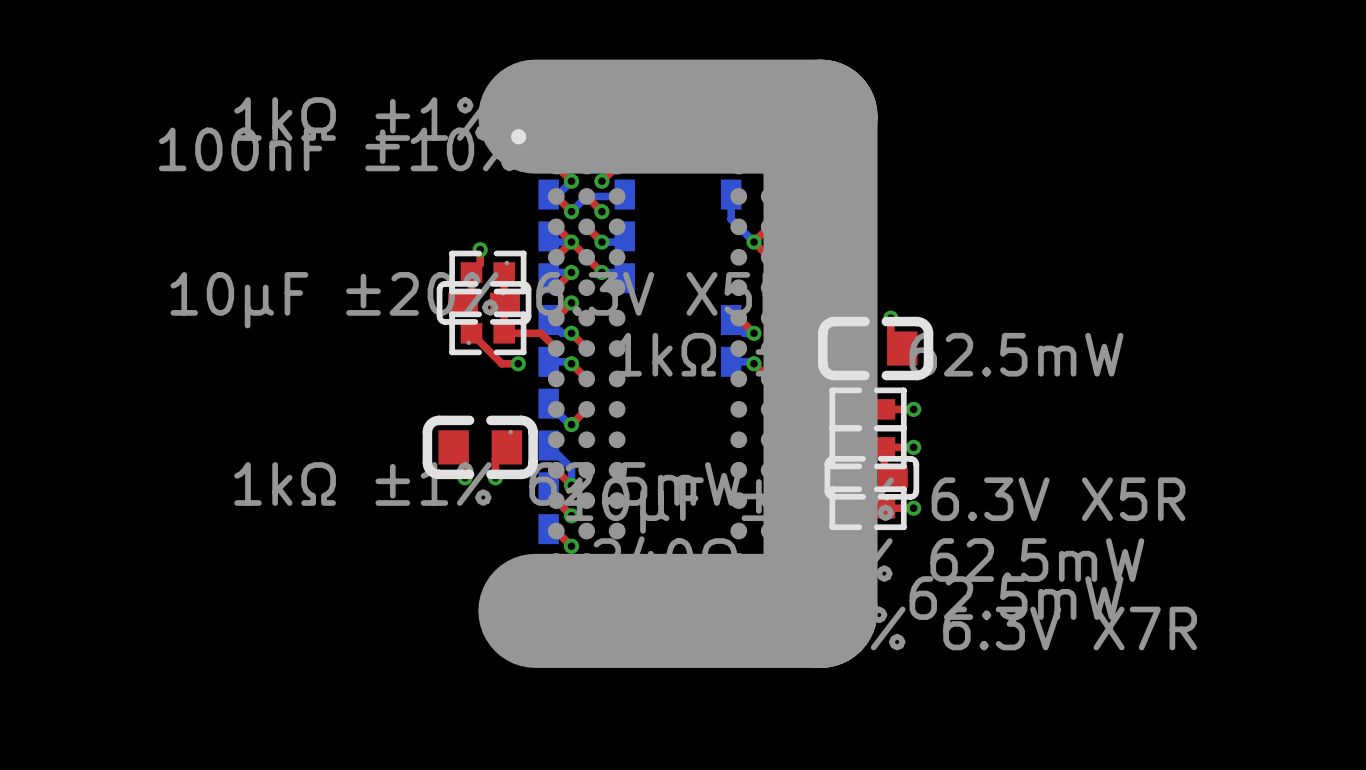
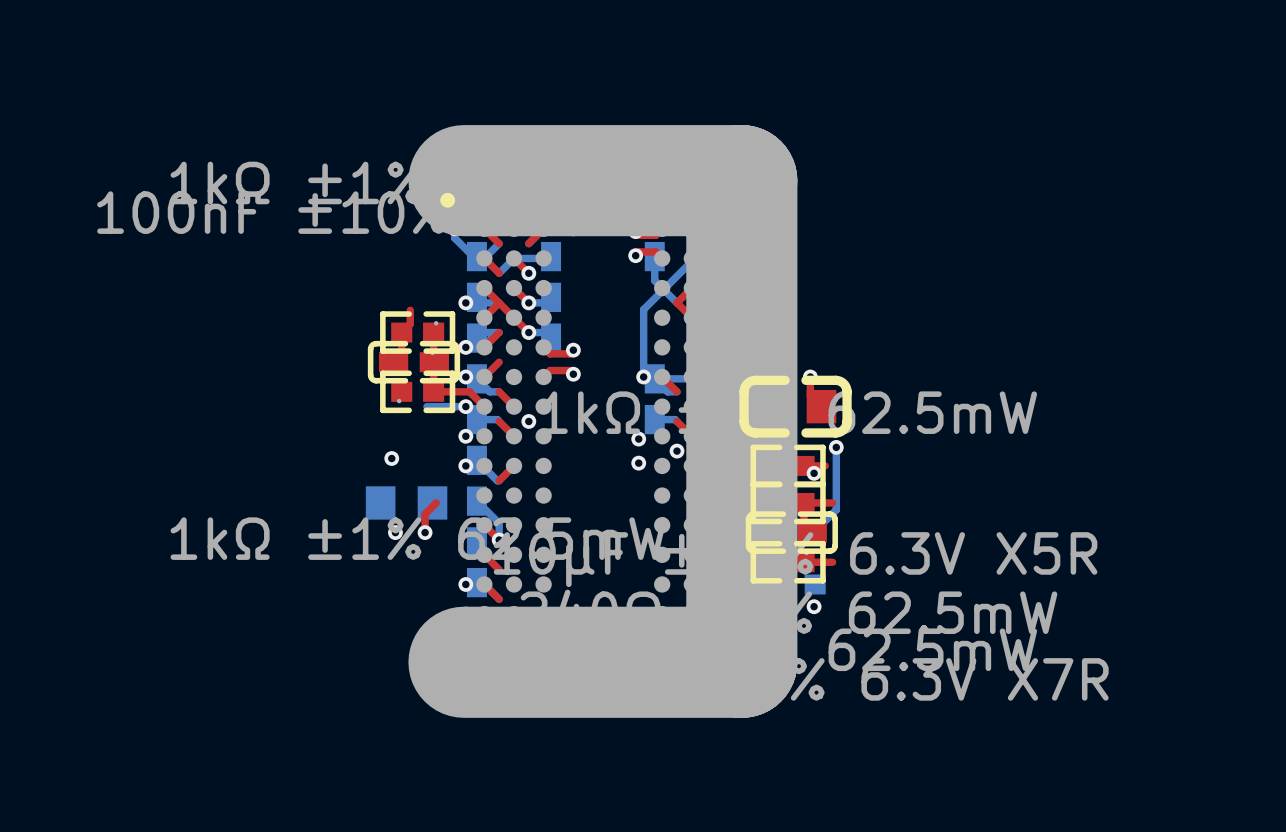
bottom track: none -> (454, 228) (454, 238) (476, 260)
via: none -> (454, 228)
top track: none -> (662, 228) (655, 235) (639, 235) (635, 231)
via: none -> (635, 231)
via: (571, 181) -> none
via: (601, 181) -> none
top track: none -> (635, 255) (639, 251) (655, 251) (662, 258)
via: none -> (635, 255)
via: (571, 211) -> none
bottom track: none -> (739, 288) (739, 282) (714, 256) (696, 256) (643, 309) (643, 377) (645, 378) (684, 378)
via: none -> (465, 302)
via: (571, 242) -> none
via: (753, 242) -> none
via: (480, 249) -> none
via: (571, 272) -> none
via: none -> (465, 347)
top track: none -> (543, 347) (550, 353) (569, 353) (573, 350)
via: none -> (573, 350)
via: (571, 302) -> none
top track: none -> (573, 374) (569, 370) (550, 370) (543, 377)
via: none -> (573, 374)
via: none -> (465, 377)
via: none -> (643, 377)
top track: (471, 333) (501, 363) (518, 363) -> none
via: (571, 333) -> none
via: (753, 333) -> none
bottom track: none -> (426, 406) (465, 406)
via: none -> (465, 406)
via: (518, 363) -> none
via: (571, 363) -> none
via: none -> (528, 421)
via: (753, 363) -> none
via: none -> (465, 436)
via: none -> (638, 439)
bottom track: none -> (836, 447) (836, 509) (821, 525) (815, 525)
via: none -> (836, 447)
via: none -> (677, 451)
via: none -> (391, 458)
via: none -> (638, 463)
via: none -> (465, 465)
via: (913, 409) -> none
via: none -> (814, 473)
via: (571, 424) -> none
part side: top (480, 447) -> bottom (406, 502)
via: (913, 447) -> none
via: (913, 508) -> none
via: (571, 515) -> none
via: none -> (465, 584)
part: none -> (799, 584)
via: (571, 546) -> none
via: none -> (814, 606)

